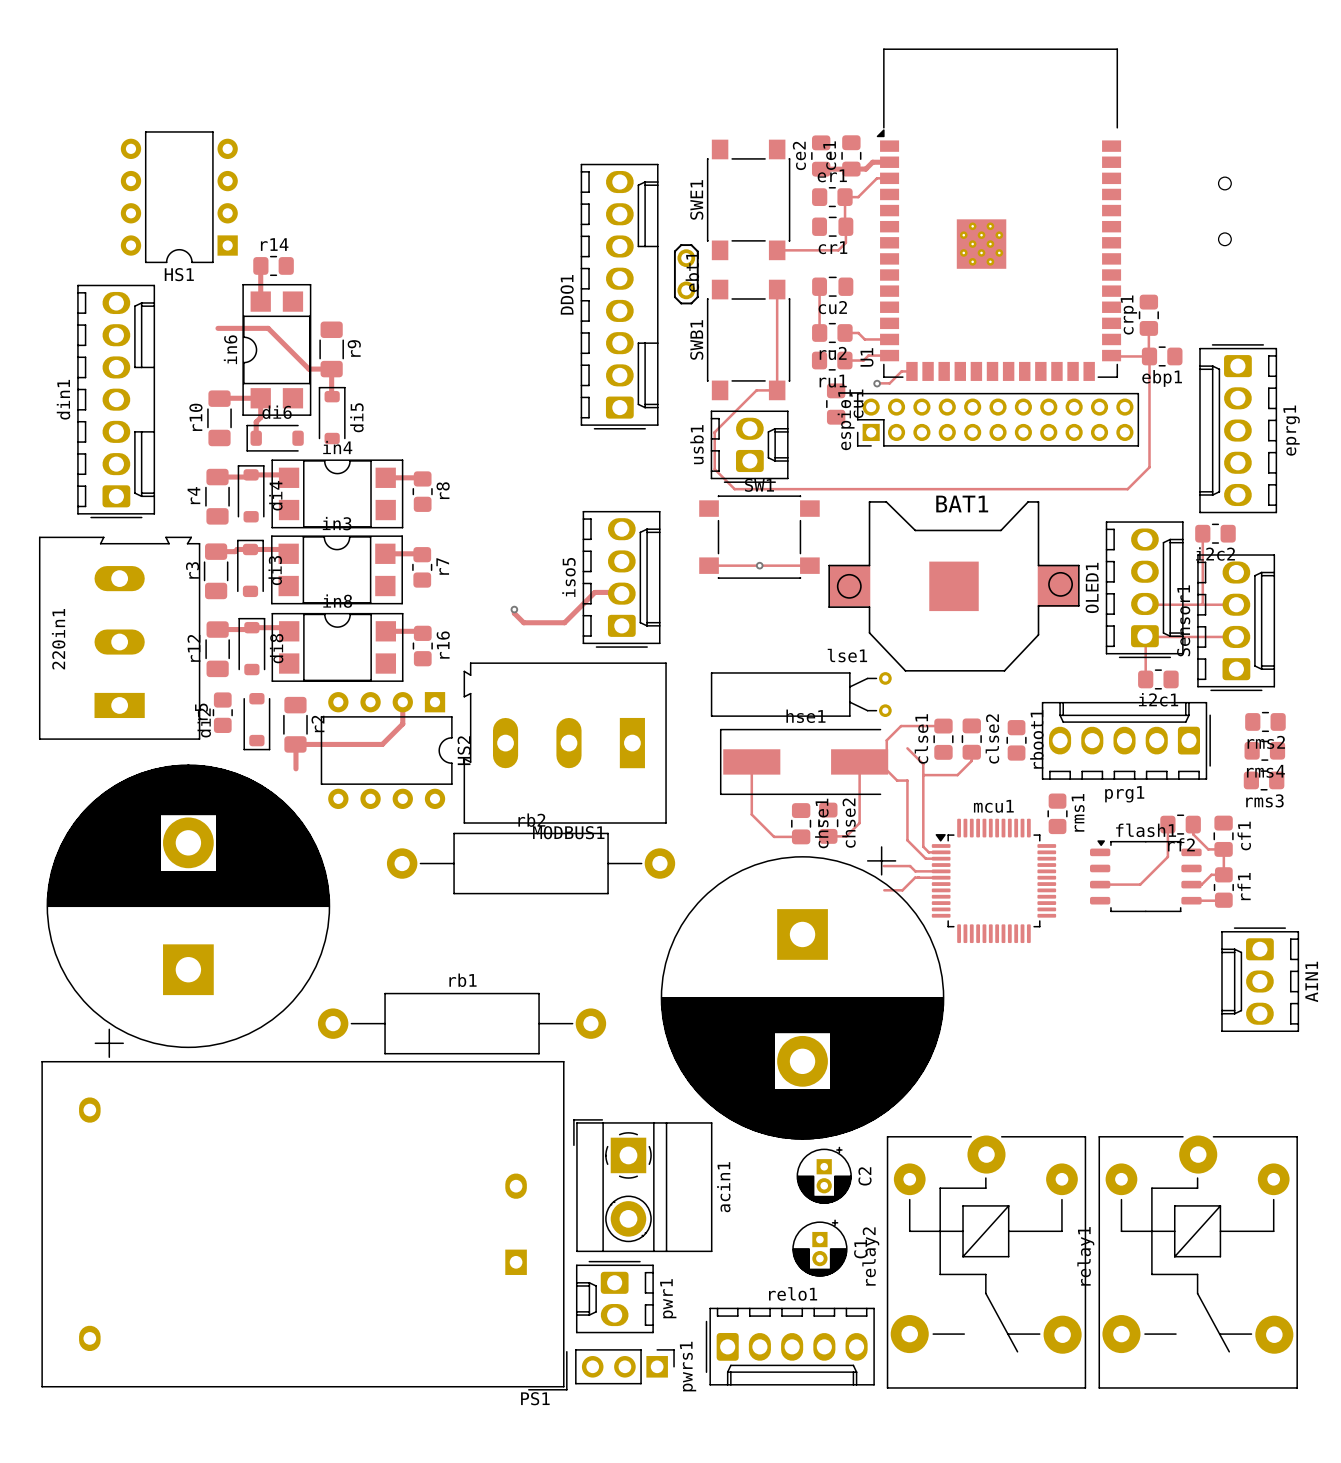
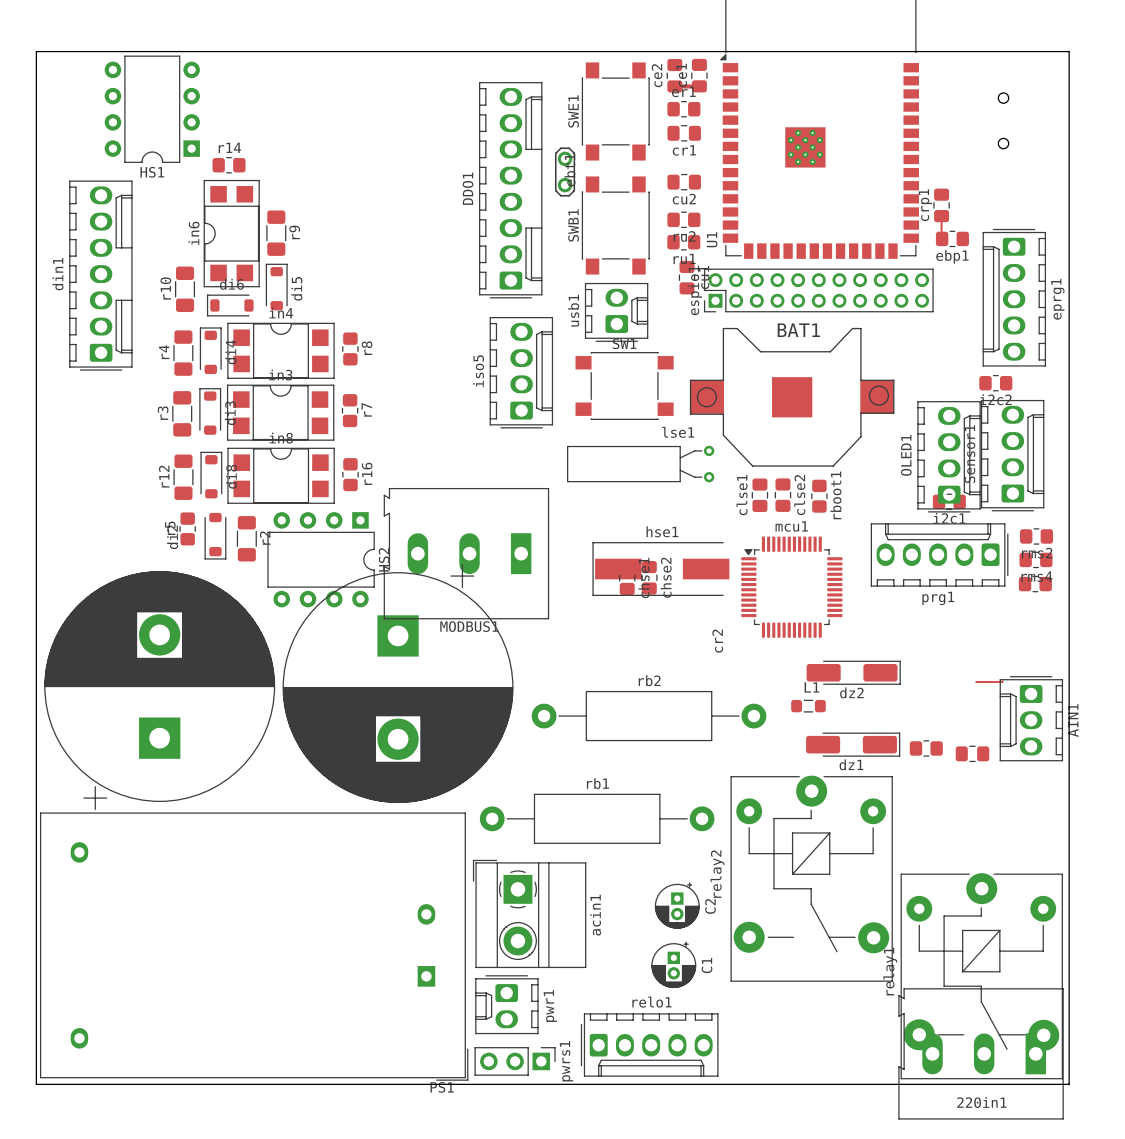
board edge: none -> (36, 51) (1069, 51) (1069, 1084) (36, 1084) (36, 51)
track: (889, 162) (872, 162) (865, 169) (851, 169) -> none
track: (889, 178) (877, 178) (858, 197) (845, 197) (845, 242) (838, 250) (777, 250) -> none
track: (260, 266) (260, 301) -> none
track: (819, 286) (819, 332) -> none
track: (777, 289) (777, 390) (756, 390) (714, 432) (714, 469) (734, 489) (1127, 489) (1149, 467) (1149, 356) (1111, 355) -> none
track: (217, 328) (268, 328) (308, 369) (331, 369) (332, 396) -> none
track: (845, 332) (858, 332) (864, 339) (889, 339) -> none
track: (889, 355) (868, 355) (863, 360) (844, 360) -> none
track: (911, 371) (901, 371) (889, 383) (877, 383) -> none
via: (877, 383) -> none
track: (219, 398) (260, 398) (260, 417) (256, 422) (256, 438) -> none
track: (217, 477) (286, 474) (289, 477) -> none
track: (385, 477) (422, 478) -> none
track: (1202, 533) (1201, 604) -> none
track: (216, 551) (284, 549) (288, 553) -> none
track: (385, 553) (422, 554) -> none
track: (709, 565) (809, 565) -> none
via: (759, 565) -> none
iso5 position: (621, 579) -> (521, 372)
BAT1 position: (954, 586) -> (792, 397)
OLED1 position: (1144, 589) -> (949, 456)
track: (629, 592) (594, 592) (564, 622) (523, 622) (514, 613) (514, 609) -> none
track: (1236, 604) (1146, 604) (1145, 606) -> none
via: (514, 609) -> none
track: (217, 629) (285, 627) (289, 631) -> none
track: (385, 631) (420, 631) (422, 633) -> none
track: (1236, 636) (1146, 636) (1145, 638) (1145, 679) -> none
220in1 rotation: 0° (119, 638) -> 90° counterclockwise (981, 1053)
220in1 position: (119, 638) -> (981, 1053)
lse1 position: (801, 694) -> (640, 464)
track: (402, 702) (402, 724) (382, 744) (295, 744) (295, 768) -> none
track: (943, 726) (901, 726) (886, 740) (886, 770) (897, 780) (907, 780) (907, 840) (925, 858) (941, 858) -> none
clse1 position: (943, 739) -> (759, 495)
clse2 position: (971, 739) -> (782, 495)
rboot1 position: (1016, 740) -> (819, 496)
prg1 position: (1126, 740) -> (939, 554)
track: (907, 748) (923, 764) (923, 846) (928, 852) (941, 852) -> none
track: (971, 752) (971, 760) (957, 775) (923, 775) -> none
track: (751, 761) (751, 814) (774, 836) (801, 836) -> none
track: (859, 761) (859, 823) (846, 836) (828, 836) -> none
rms3 name: rms3 (1264, 800) -> none
rms1: (1057, 813) -> none
chse1 position: (801, 823) -> (627, 578)
chse2 position: (828, 823) -> (649, 577)
track: (1167, 824) (1167, 856) (1140, 884) (1100, 884) -> none
rf2: (1180, 824) -> none
track: (1193, 824) (1193, 834) (1208, 849) (1223, 849) (1223, 874) (1211, 874) (1201, 884) (1191, 884) -> none
cf1: (1223, 836) -> none
rb2 position: (531, 863) -> (649, 716)
track: (883, 866) (910, 866) (915, 871) (941, 871) -> none
flash1: (1145, 876) -> none
track: (941, 877) (915, 877) (902, 890) (884, 890) -> none
mcu1 position: (993, 880) -> (791, 587)
rf1: (1223, 887) -> none
dz2: none -> (853, 672)
cr2: none -> (398, 683)
L1: none -> (808, 706)
dz1: none -> (853, 744)
AIN1 position: (1260, 979) -> (1031, 718)
part: none -> (926, 748)
part: none -> (972, 753)
part: (802, 992) -> none
rb1 position: (462, 1023) -> (597, 818)
relay2 position: (986, 1262) -> (811, 878)

